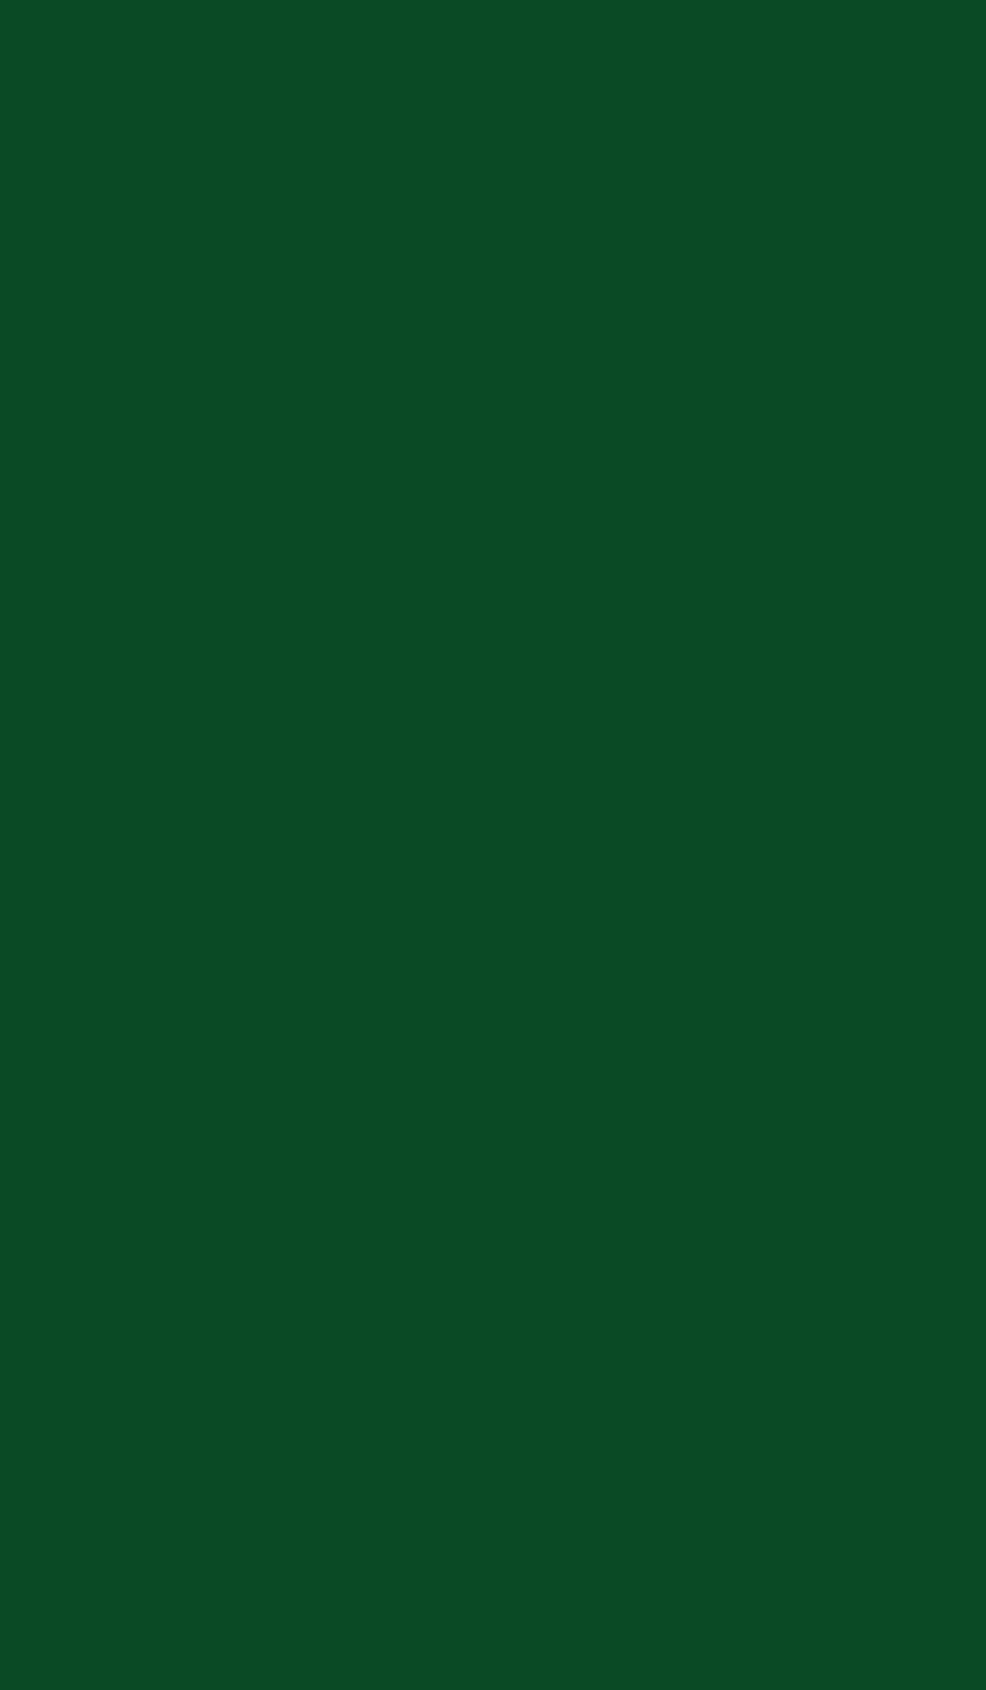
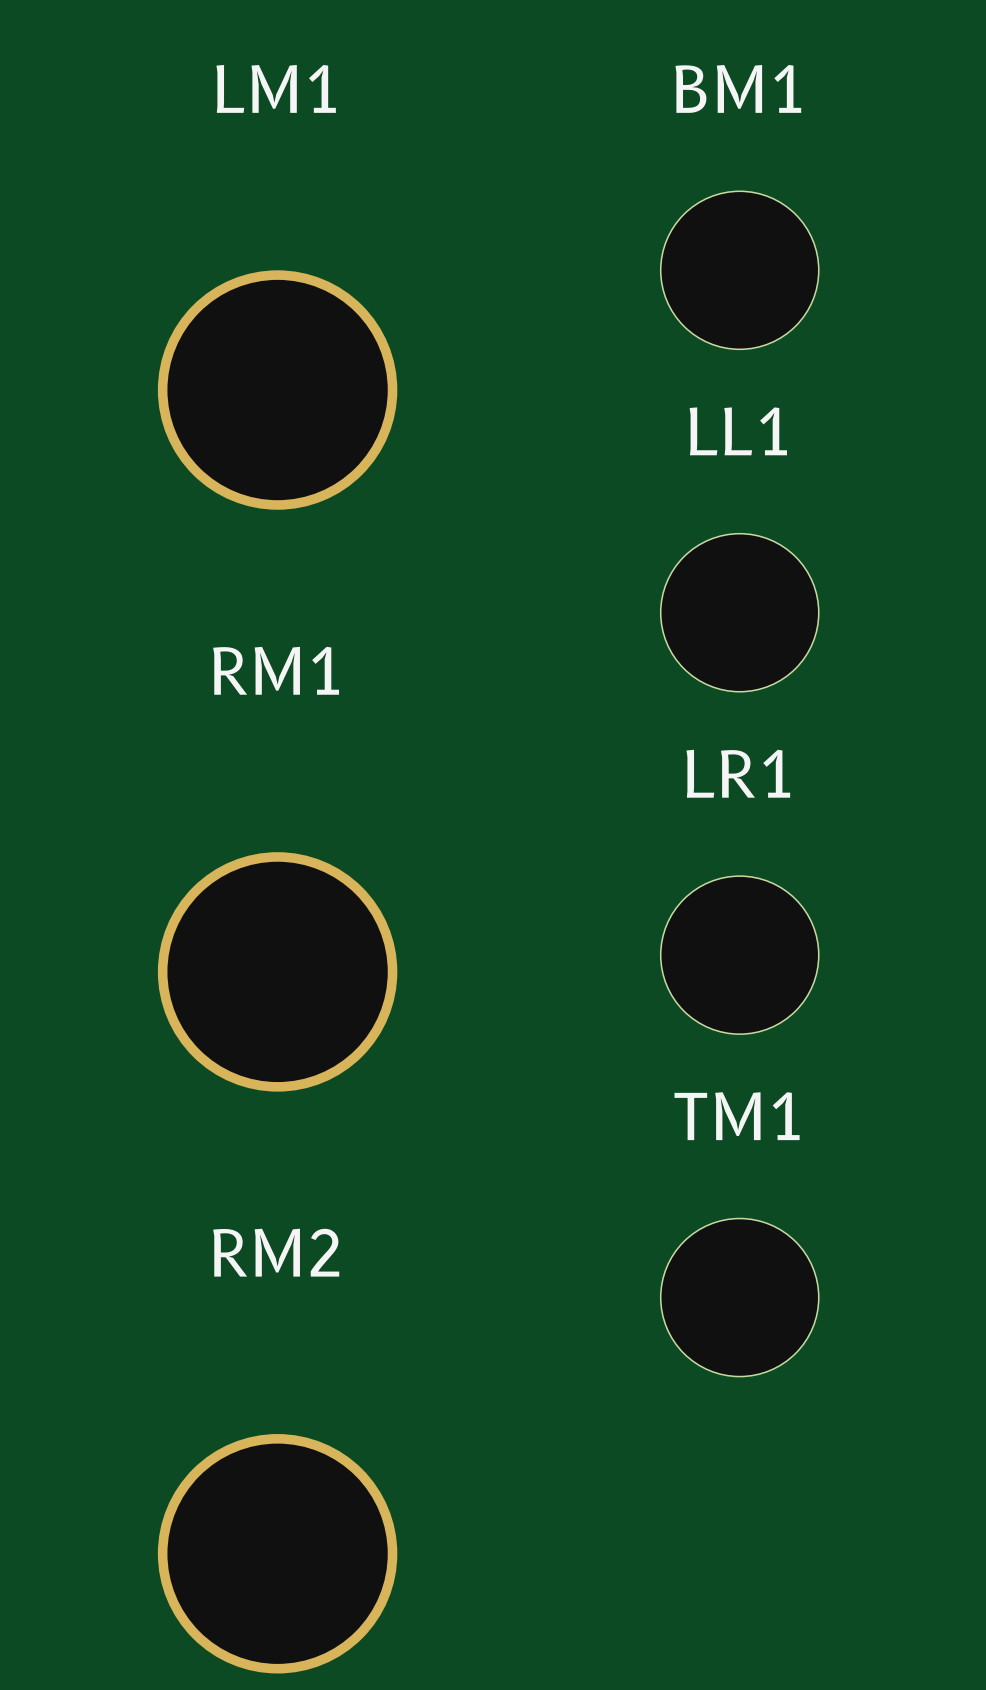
BM1: none -> (739, 270)
LM1: none -> (277, 390)
LL1: none -> (739, 612)
LR1: none -> (739, 955)
RM1: none -> (277, 971)
TM1: none -> (739, 1297)
RM2: none -> (277, 1553)

